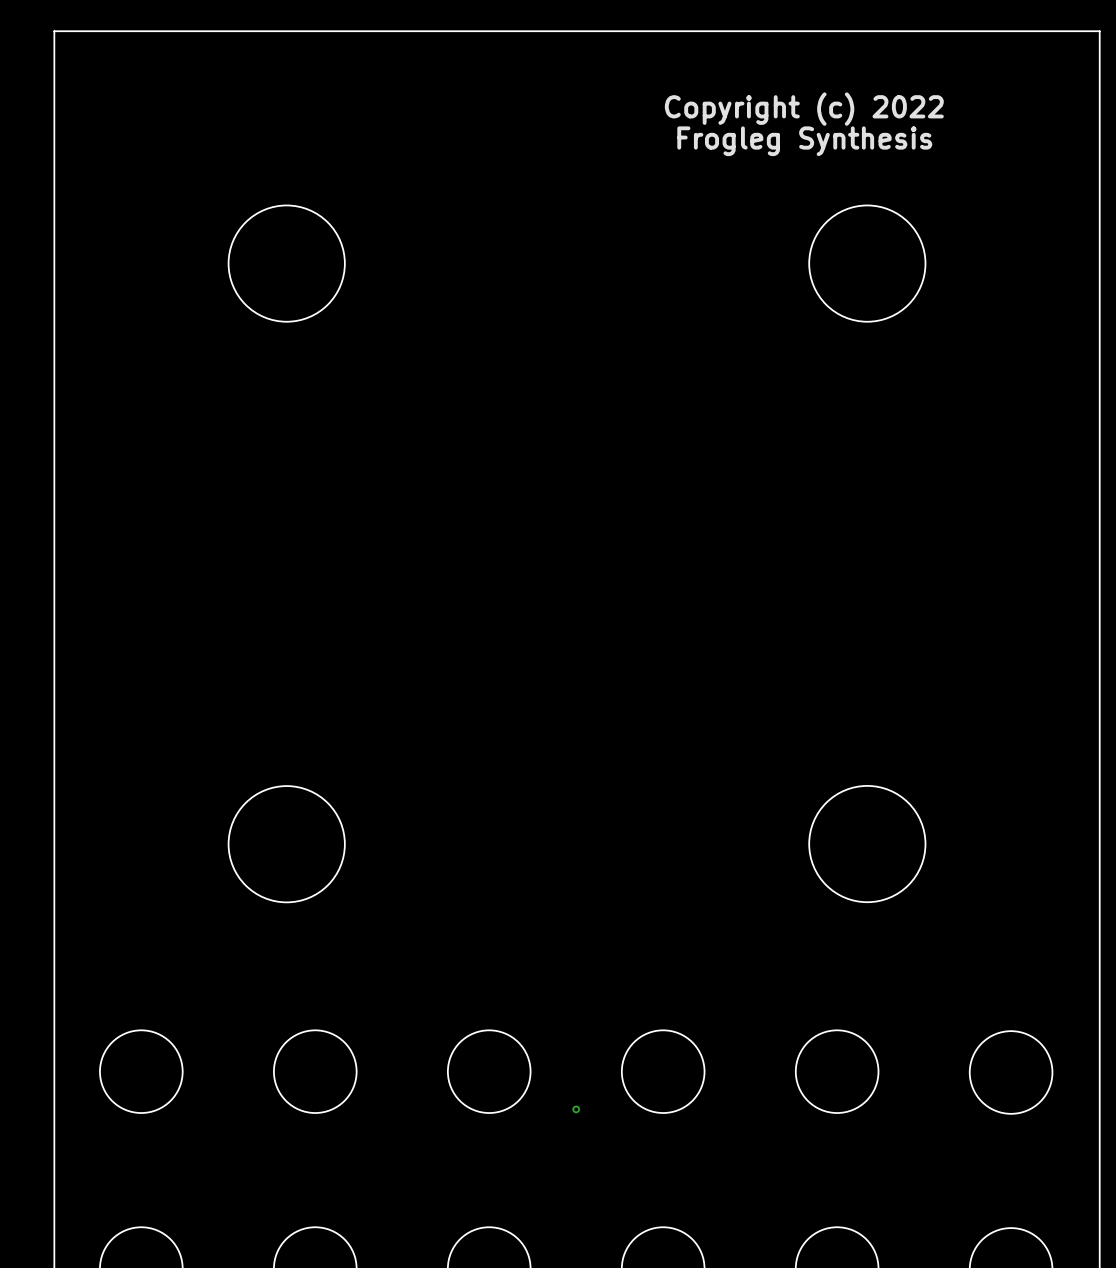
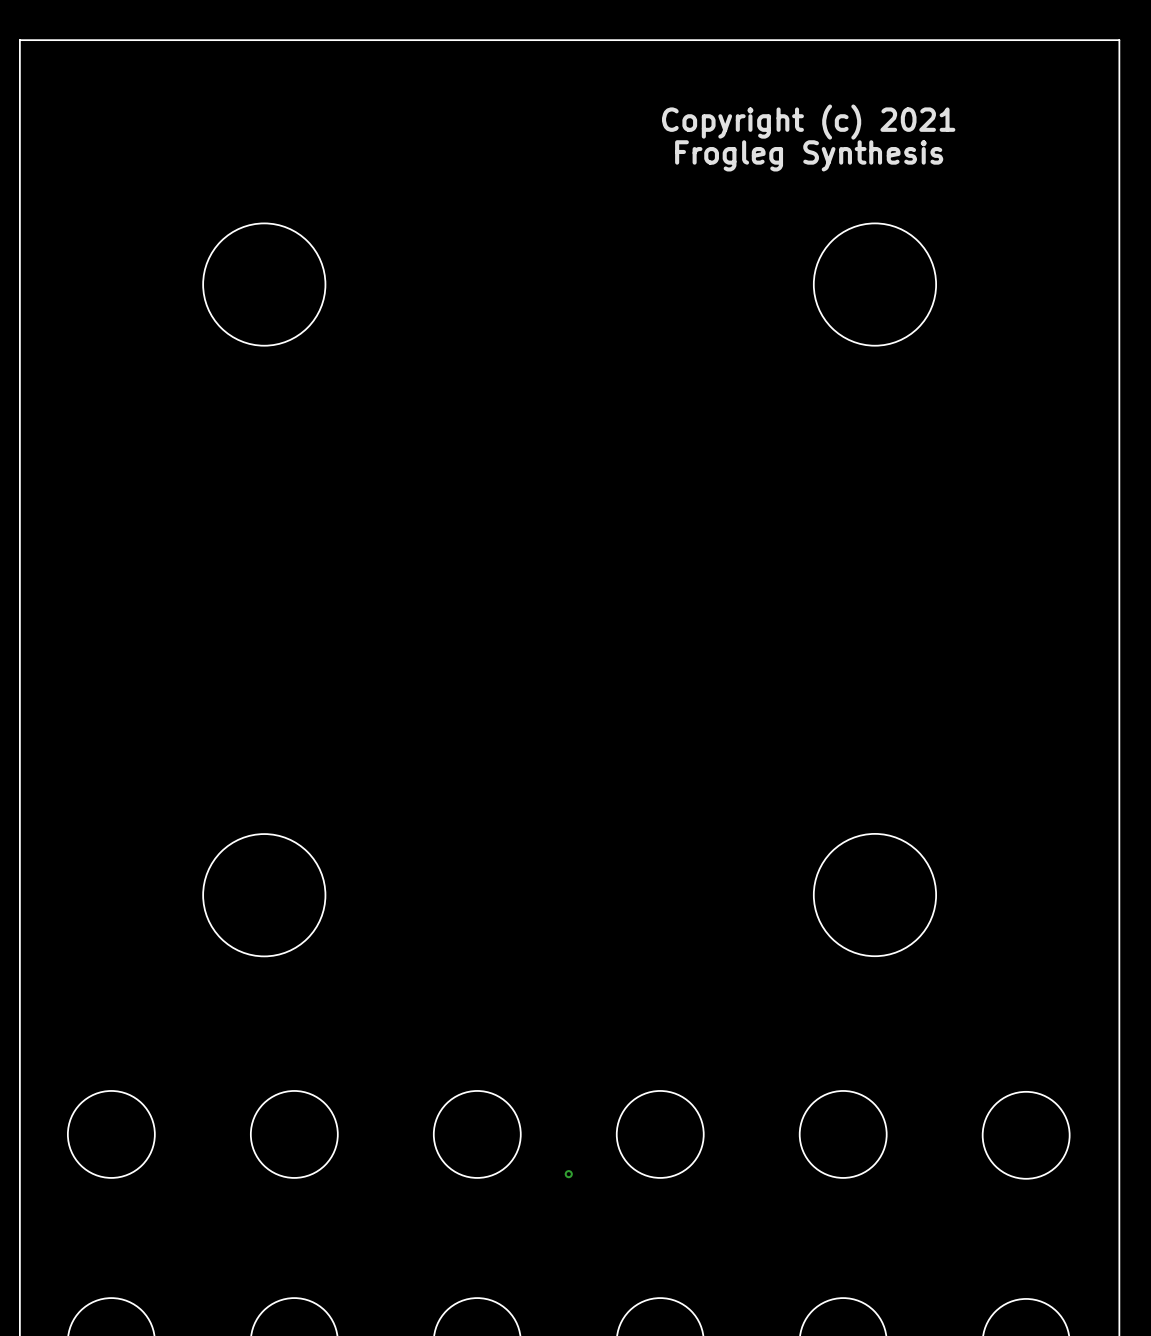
text: Copyright (c) 2022 (804, 109) -> Copyright (c) 2021 (808, 122)

